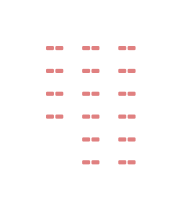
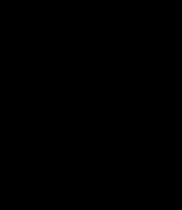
part: (54, 48) -> none
part: (90, 48) -> none
part: (126, 48) -> none
part: (54, 70) -> none
part: (90, 70) -> none
part: (126, 70) -> none
part: (54, 93) -> none
part: (90, 93) -> none
part: (126, 93) -> none
part: (54, 116) -> none
part: (90, 116) -> none
part: (126, 116) -> none
part: (90, 139) -> none
part: (126, 139) -> none
part: (90, 162) -> none
part: (126, 162) -> none

